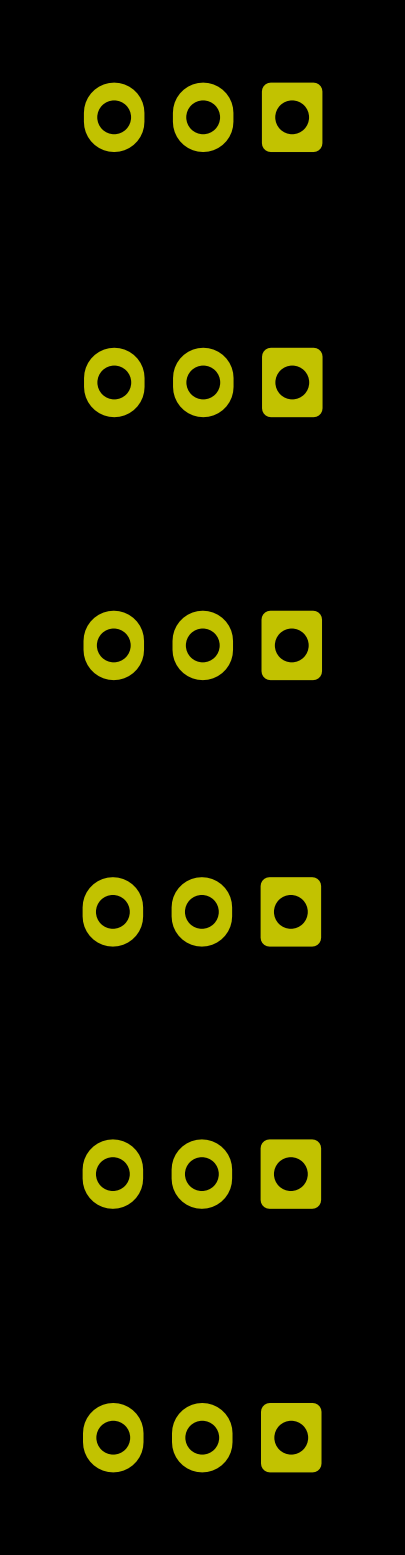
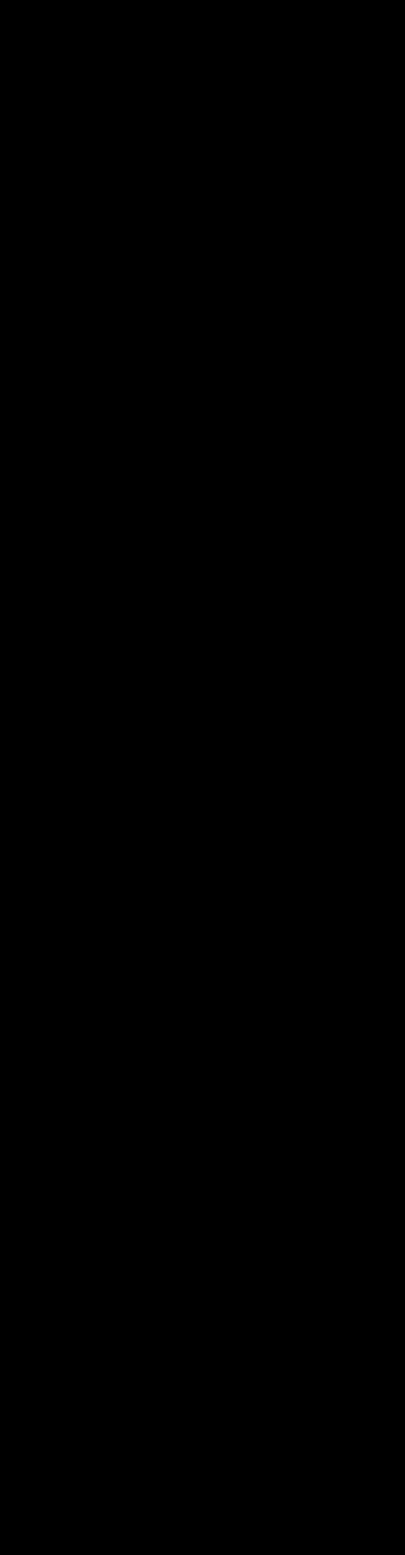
part: (203, 117) -> none
part: (203, 382) -> none
part: (202, 645) -> none
part: (201, 911) -> none
part: (201, 1174) -> none
part: (202, 1437) -> none

